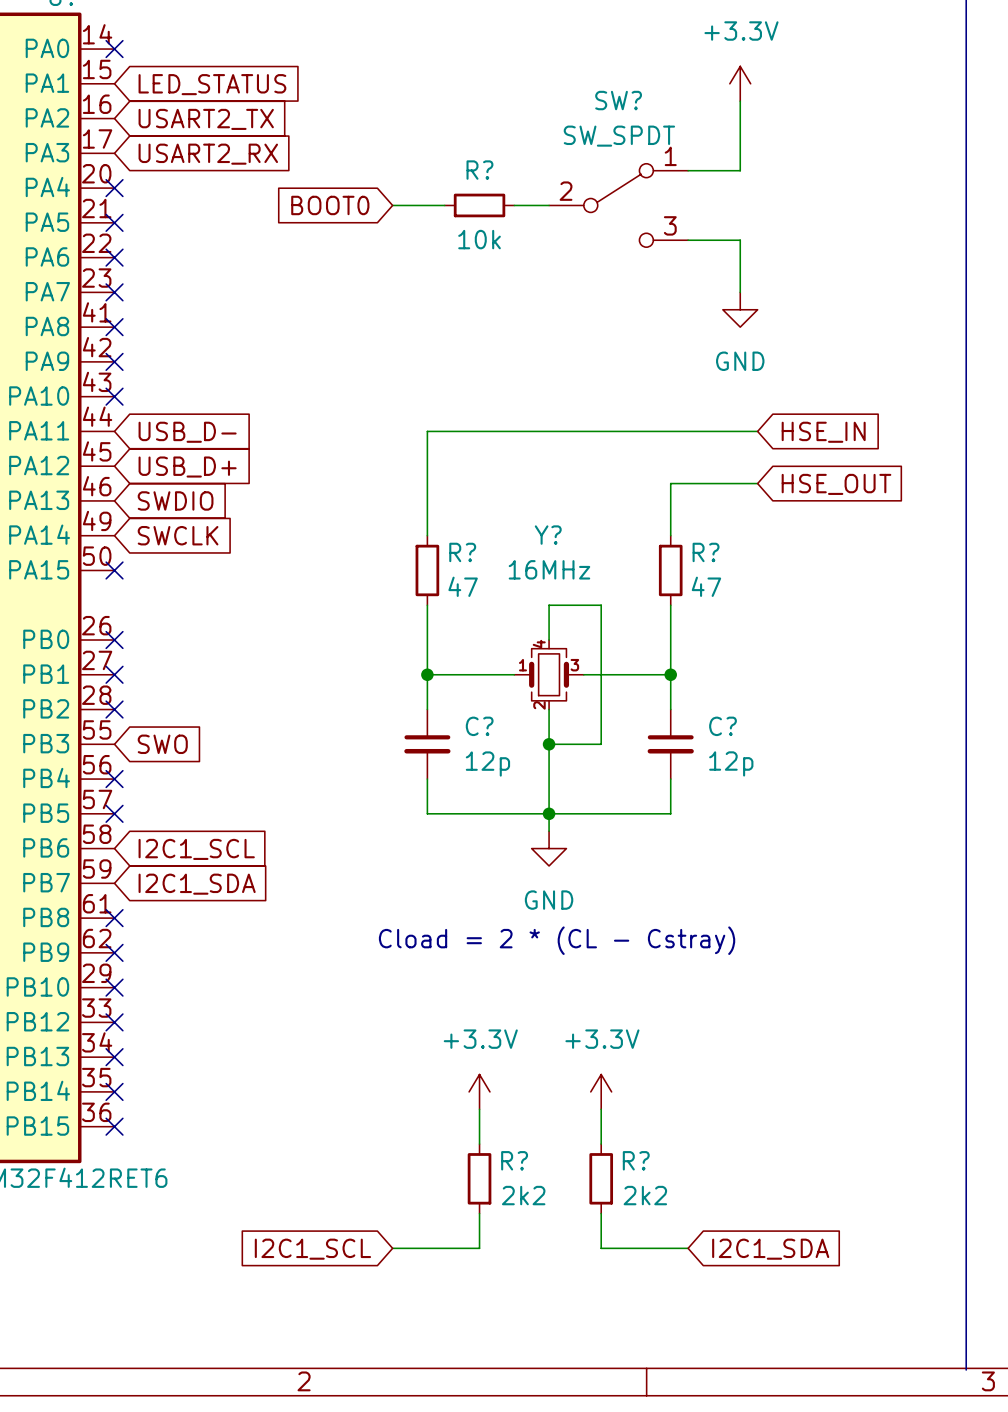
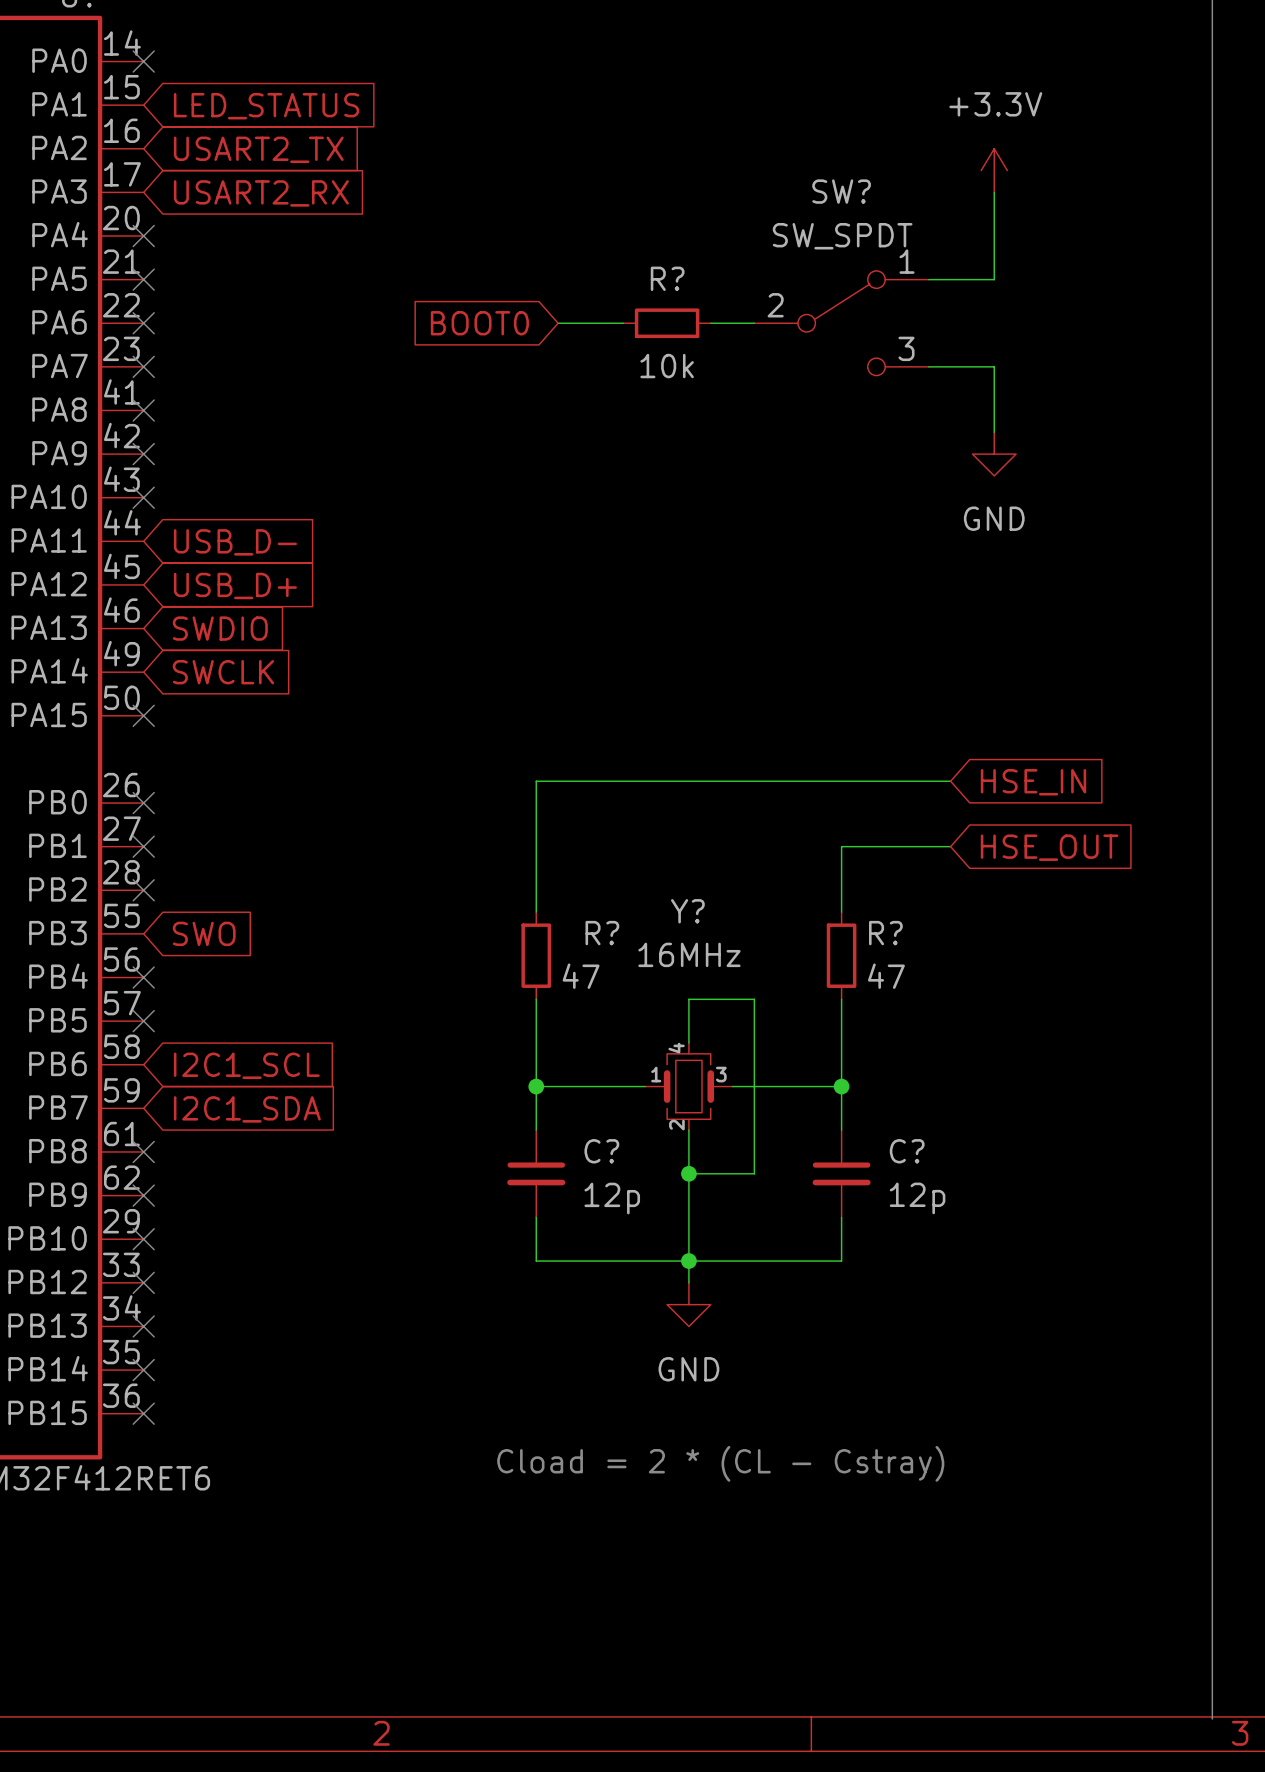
power symbol position: +3.3V (740, 83) -> +3.3V (994, 170)
wire: (740, 101) (740, 170) (688, 170) -> (994, 192) (994, 279) (928, 279)
global label position: BOOT0 (330, 205) -> BOOT0 (479, 323)
wire: (392, 205) (444, 205) -> (558, 323) (623, 323)
R? position: (479, 205) -> (667, 323)
wire: (514, 205) (549, 205) -> (710, 323) (754, 323)
SW? position: (618, 205) -> (841, 323)
wire: (688, 240) (740, 240) (740, 292) -> (994, 432) (994, 366) (928, 366)
power symbol position: GND (740, 309) -> GND (994, 454)
wire: (757, 431) (427, 431) (427, 535) -> none
global label position: HSE_IN (823, 432) -> HSE_IN (1033, 782)
wire: (757, 483) (670, 483) (670, 535) -> none
global label position: HSE_OUT (836, 484) -> HSE_OUT (1049, 847)
R?: 47 (427, 570) -> none
R?: 47 (670, 570) -> none
wire: (427, 605) (427, 622) -> (950, 781) (536, 781)
wire: (670, 605) (670, 674) (583, 674) -> none
wire: (549, 640) (549, 605) (601, 605) (601, 744) (549, 744) -> none
wire: (427, 674) (514, 674) -> (536, 1086) (645, 1086)
junction: (427, 674) -> none
Y? position: (549, 674) -> (688, 1086)
wire: none -> (841, 846) (950, 846)
junction: (670, 674) -> none
wire: (549, 709) (549, 796) -> (688, 1173) (754, 1173) (754, 999) (688, 999)
C?: 12p (427, 744) -> none
junction: (549, 744) -> none
C?: 12p (670, 744) -> none
R?: none -> 47 (536, 955)
R?: none -> 47 (841, 955)
wire: (427, 813) (670, 813) -> (536, 1021) (536, 1130)
junction: (549, 813) -> none
wire: none -> (841, 1021) (841, 1130)
power symbol position: GND (549, 848) -> GND (688, 1304)
junction: none -> (536, 1086)
wire: none -> (732, 1086) (841, 1086)
junction: none -> (841, 1086)
wire: none -> (688, 1130) (688, 1282)
C?: none -> 12p (536, 1173)
junction: none -> (688, 1173)
C?: none -> 12p (841, 1173)
text position: Cload = 2 * (CL - Cstray) (557, 940) -> Cload = 2 * (CL - Cstray) (720, 1463)
wire: none -> (536, 1217) (536, 1261) (841, 1261) (841, 1217)
junction: none -> (688, 1261)
power symbol: +3.3V (479, 1091) -> none
power symbol: +3.3V (601, 1091) -> none
wire: (479, 1109) (479, 1144) -> none
wire: (601, 1109) (601, 1144) -> none
R?: 2k2 (479, 1178) -> none
R?: 2k2 (601, 1178) -> none
wire: (479, 1213) (479, 1248) (392, 1248) -> none
wire: (601, 1213) (601, 1248) (688, 1248) -> none
global label: I2C1_SCL (312, 1249) -> none
global label: I2C1_SDA (770, 1249) -> none

